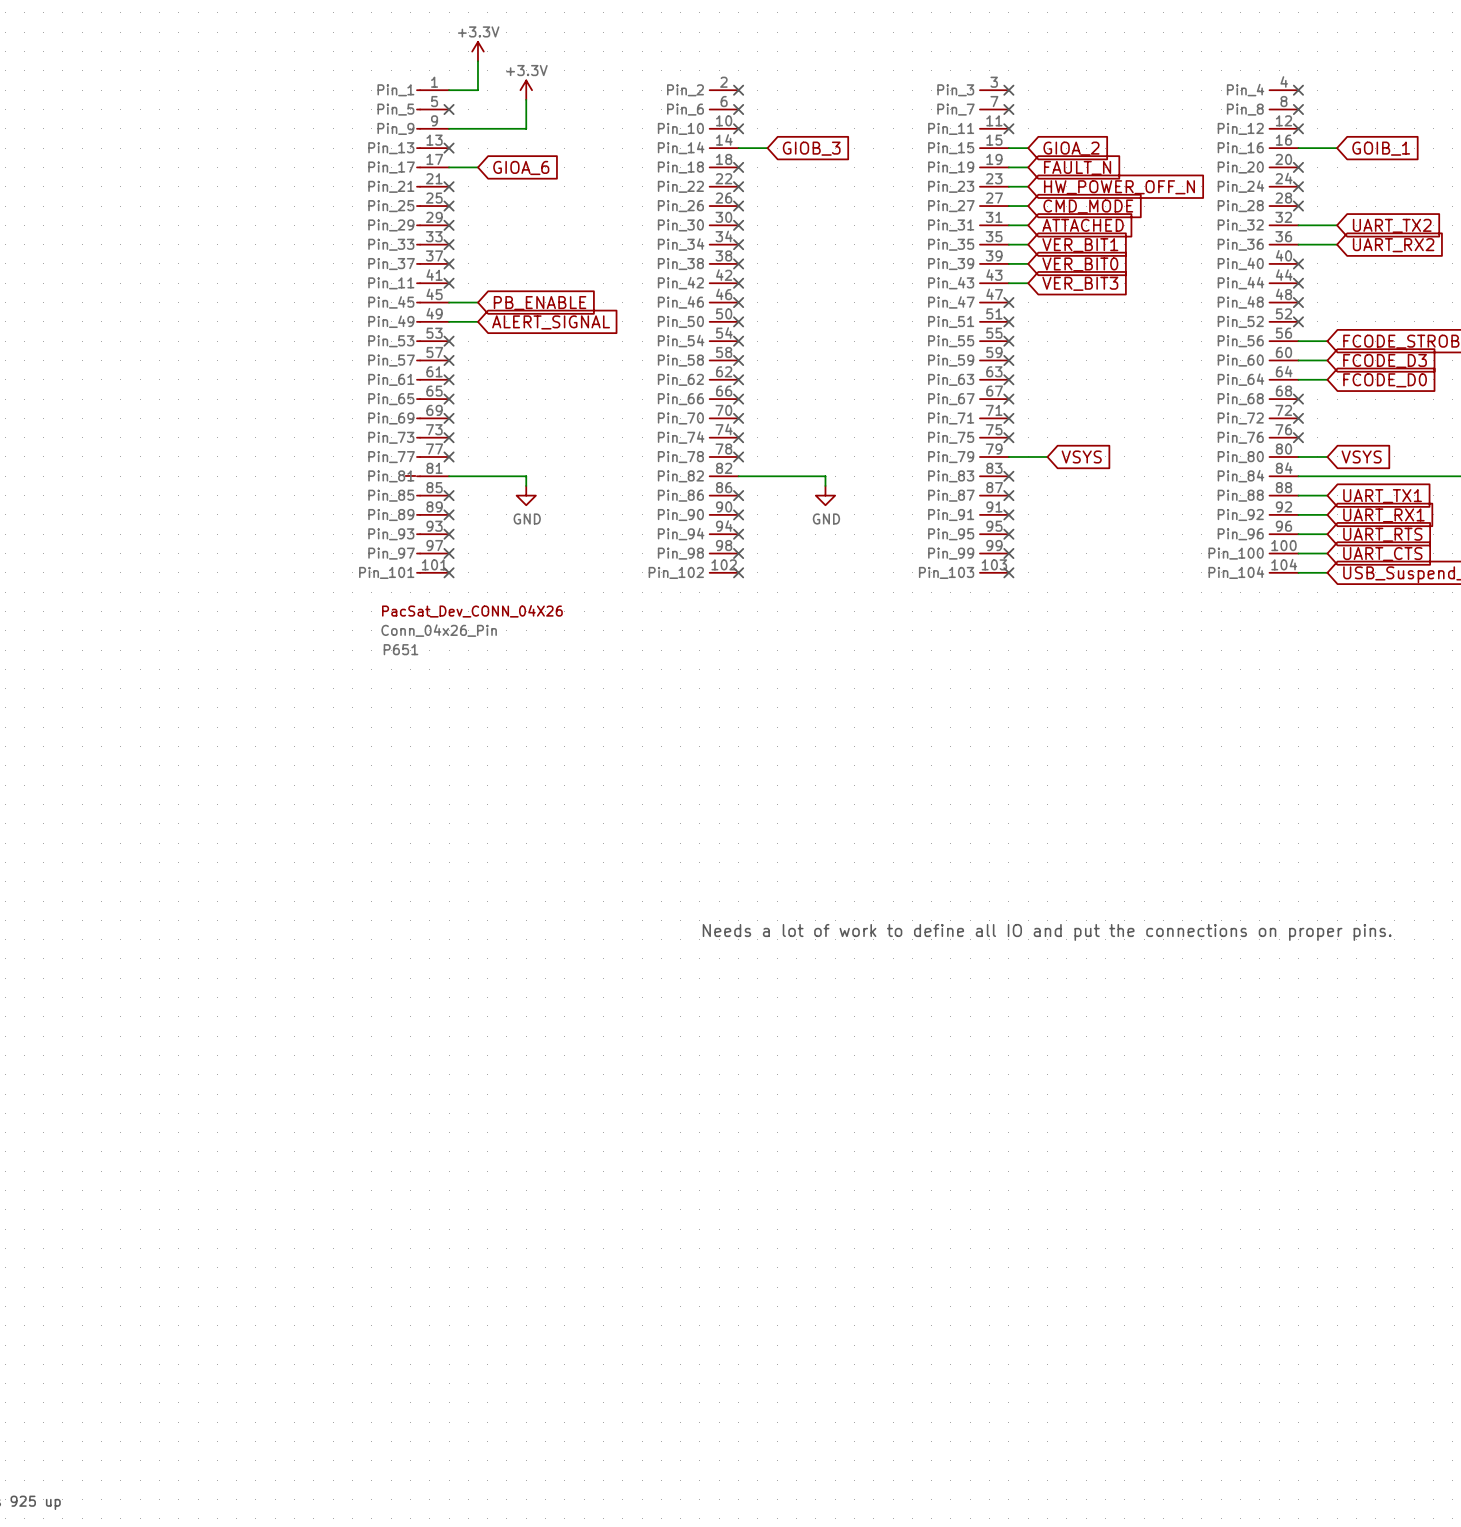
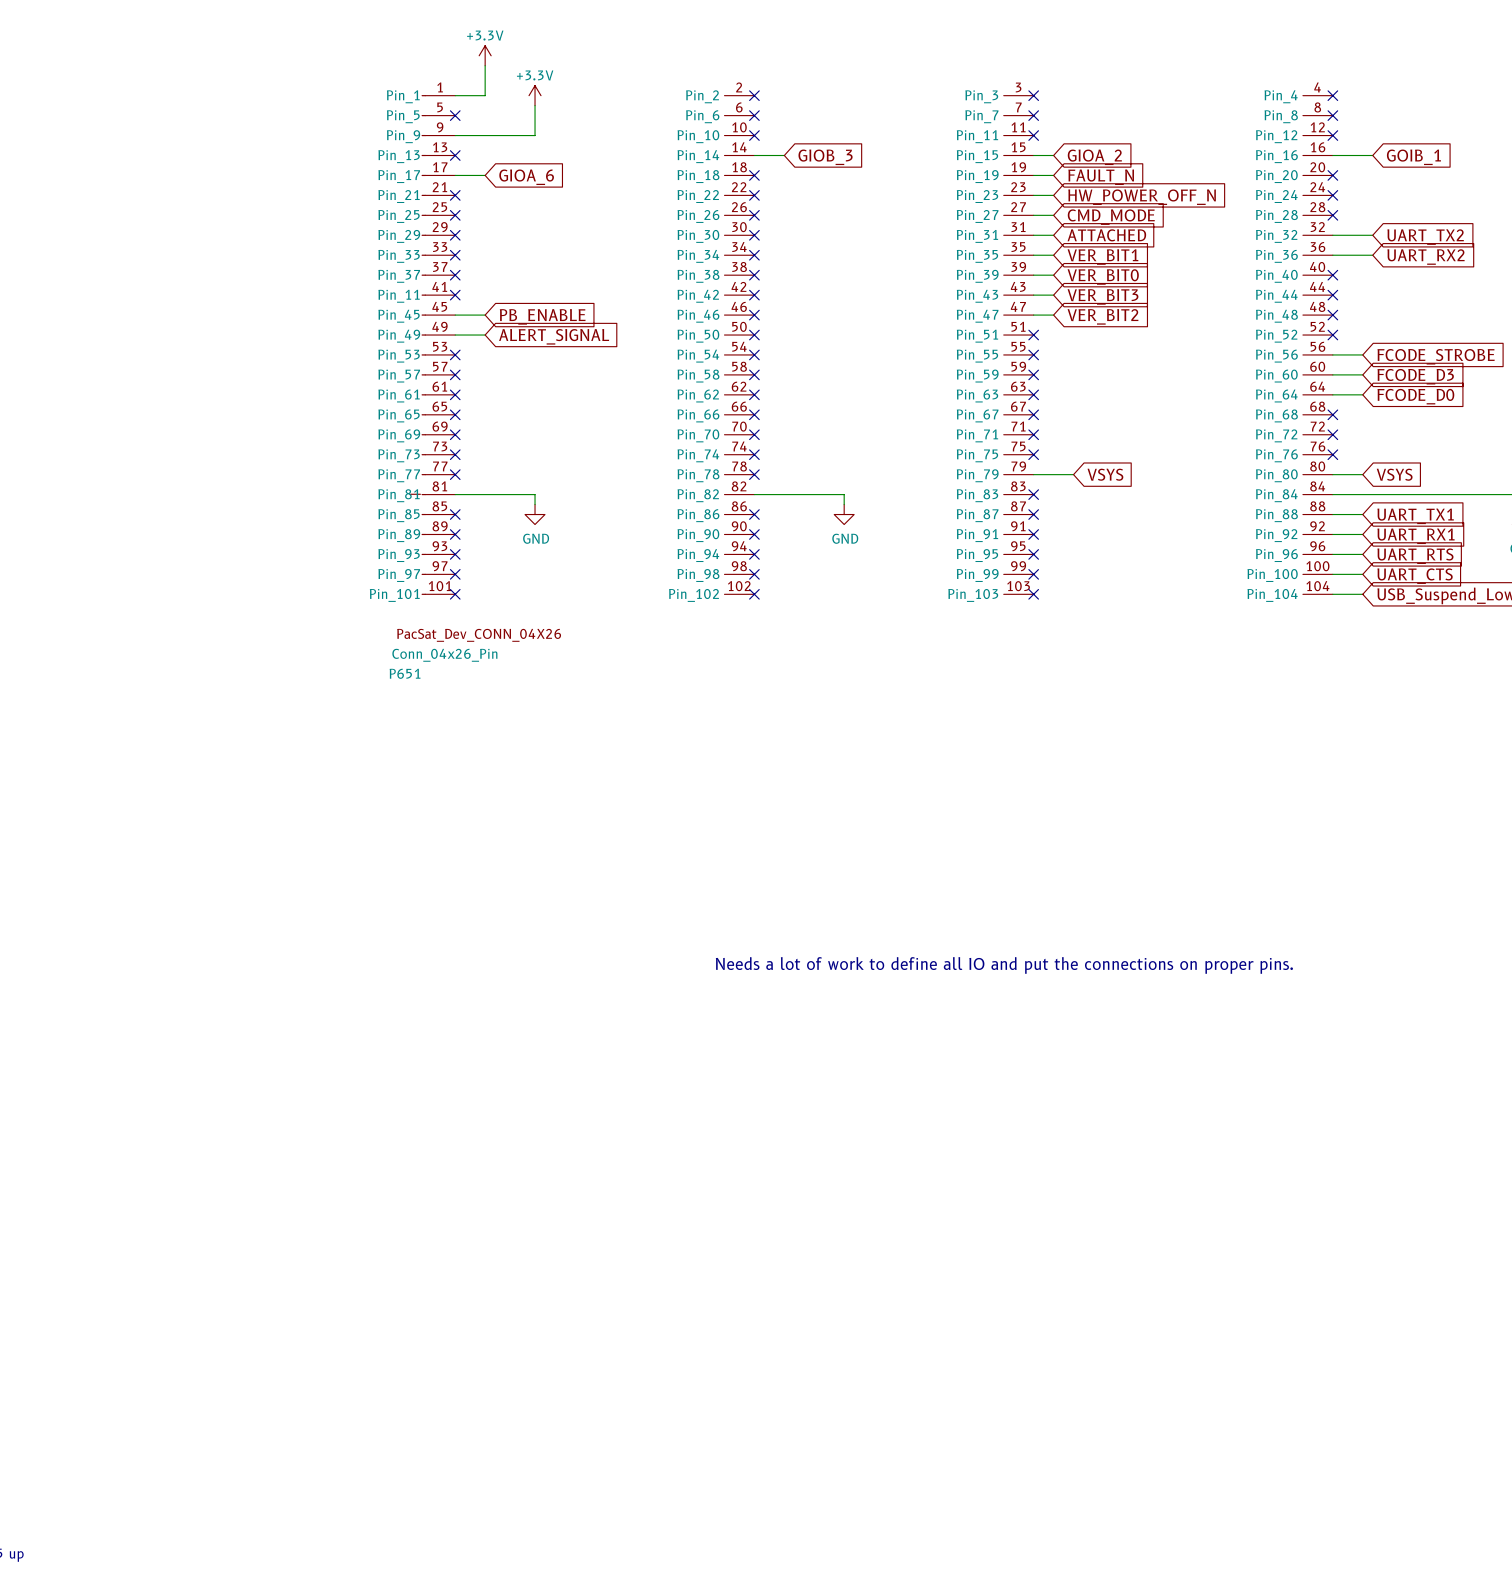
wire: none -> (1033, 315) (1053, 315)
no-connect mark: (1008, 302) -> none
global label: none -> VER_BIT2 (1102, 316)

